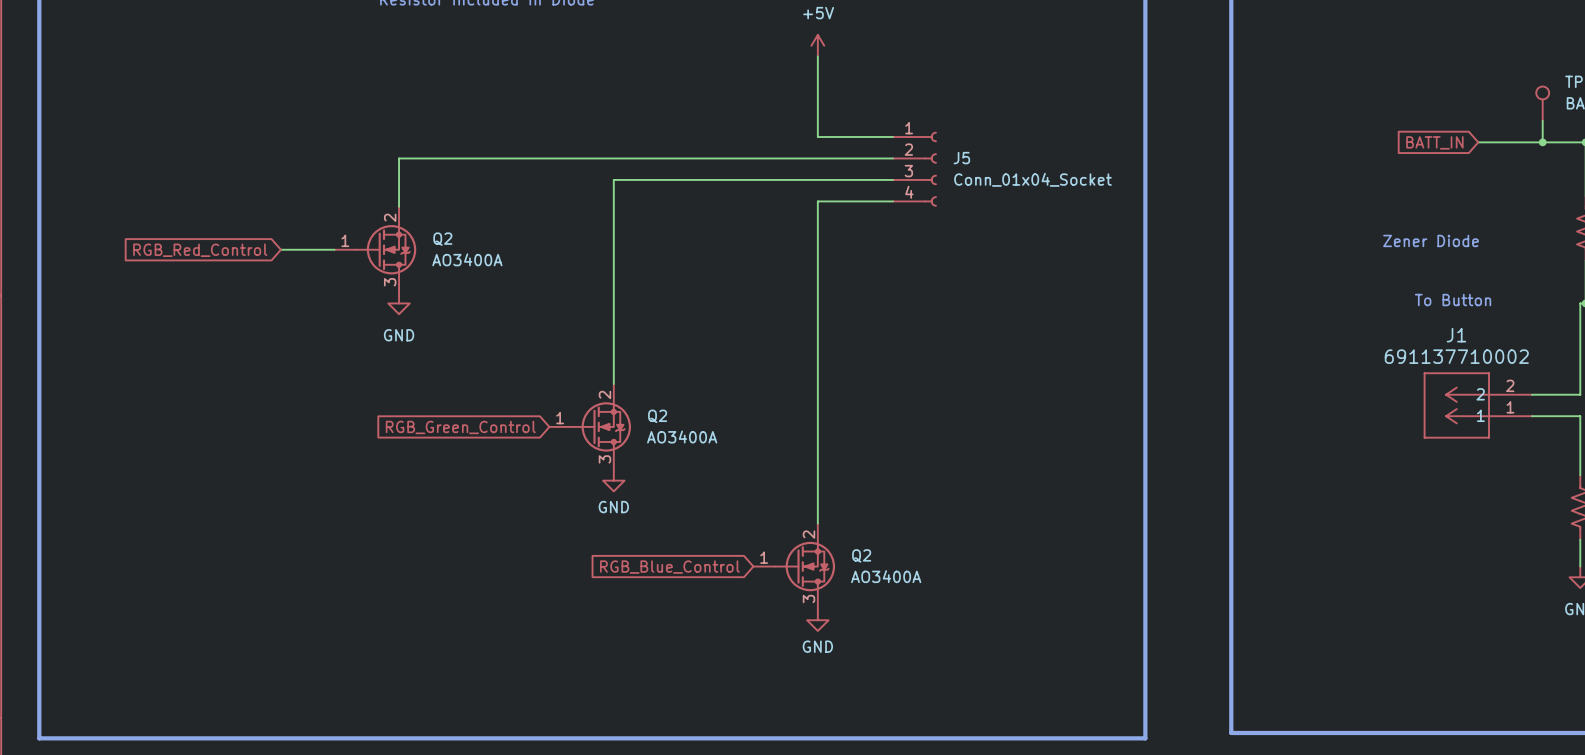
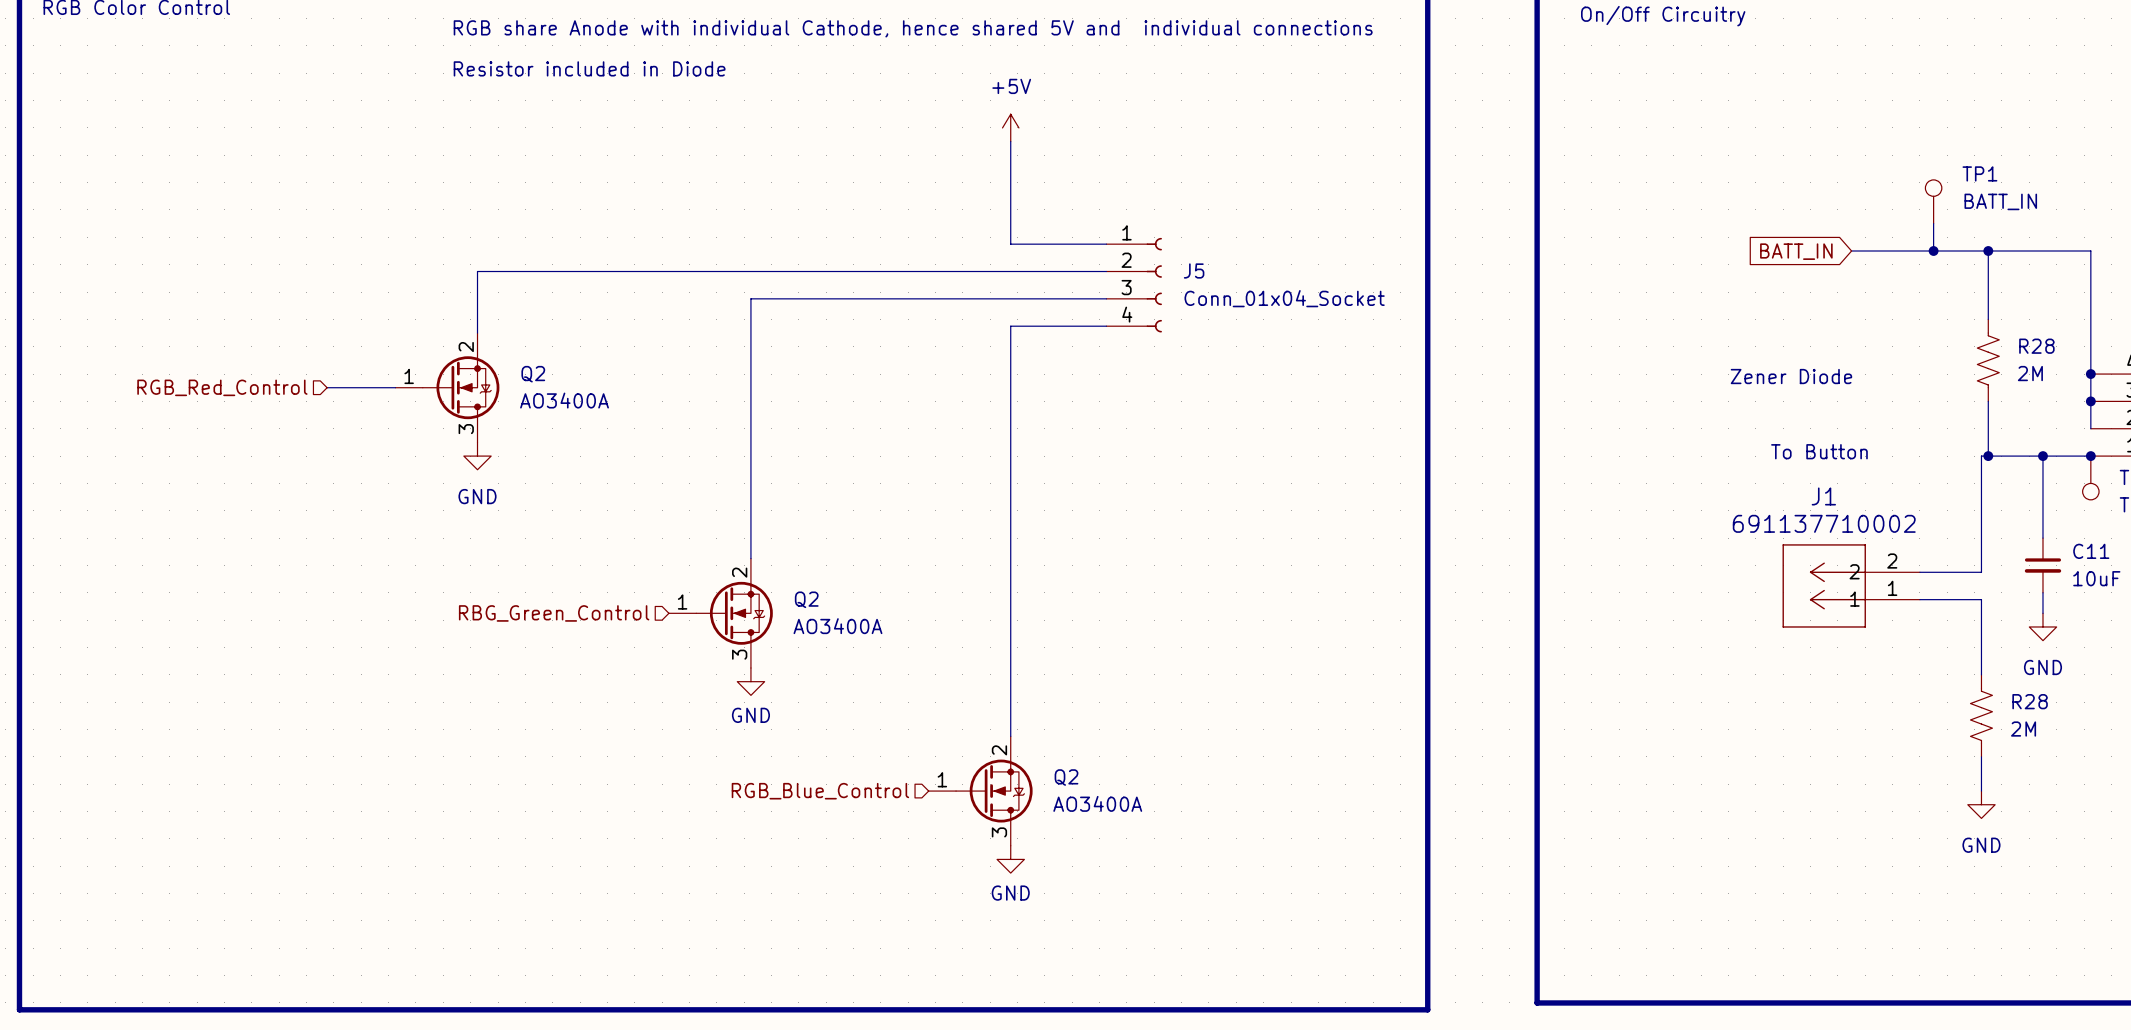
hierarchical label: none -> RGB_Red_Control (222, 387)
global label: RGB_Red_Control (200, 250) -> none
hierarchical label: none -> RBG_Green_Control (554, 613)
global label: RGB_Green_Control (460, 427) -> none
hierarchical label: none -> RGB_Blue_Control (820, 791)
global label: RGB_Blue_Control (669, 567) -> none

